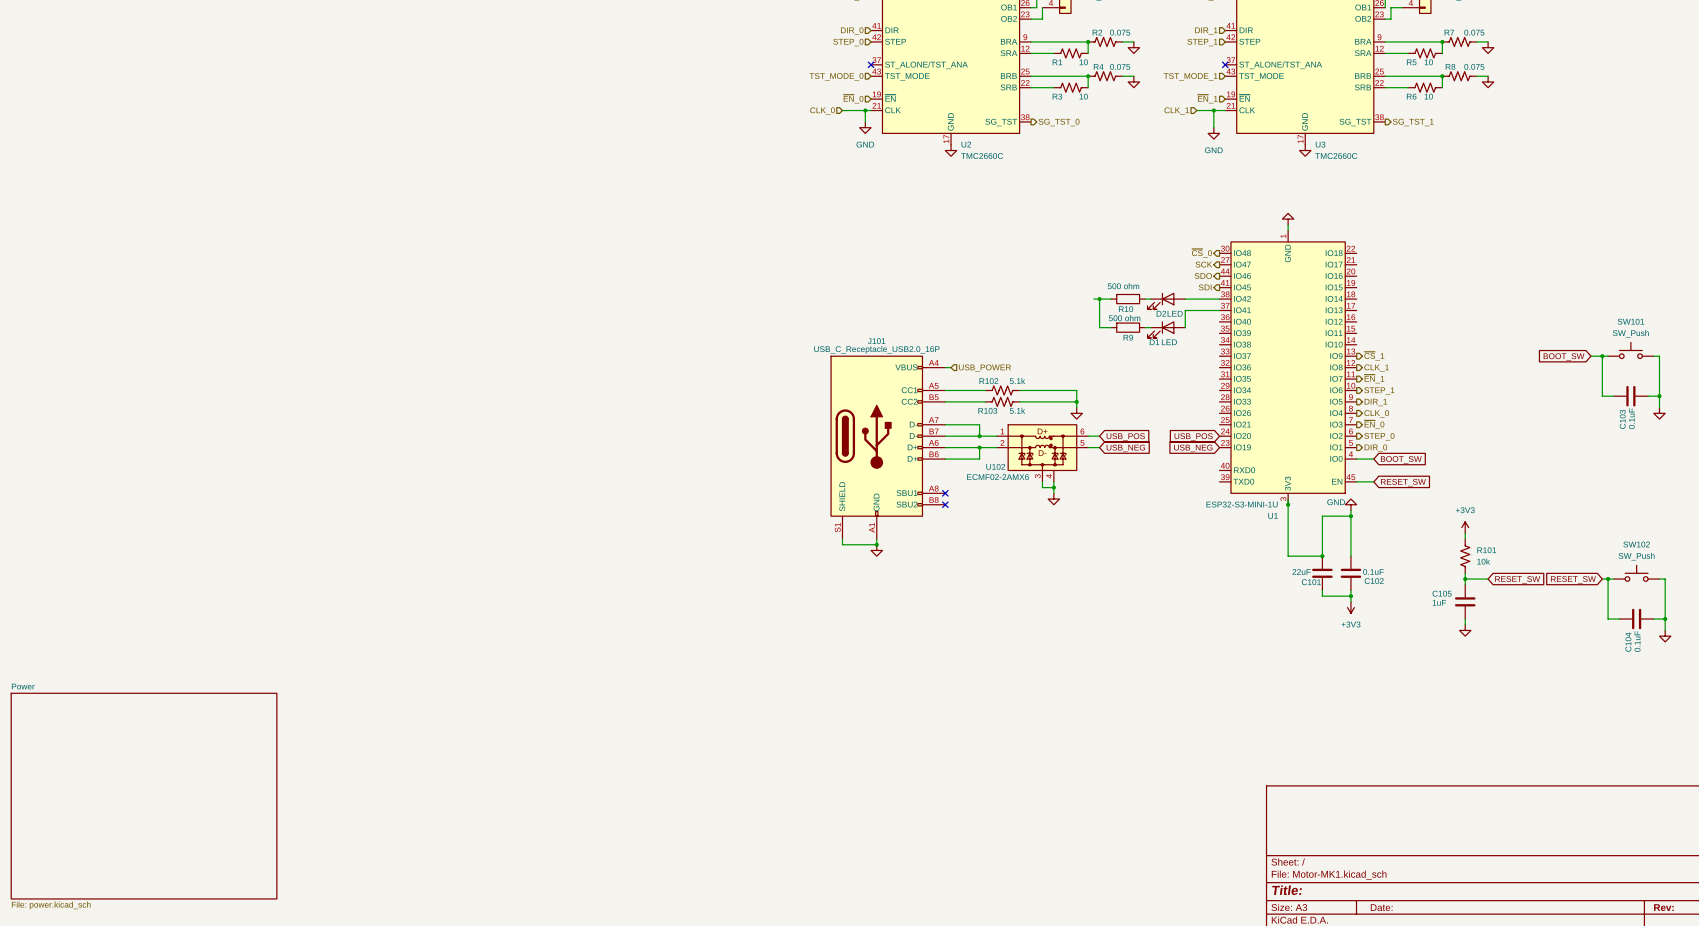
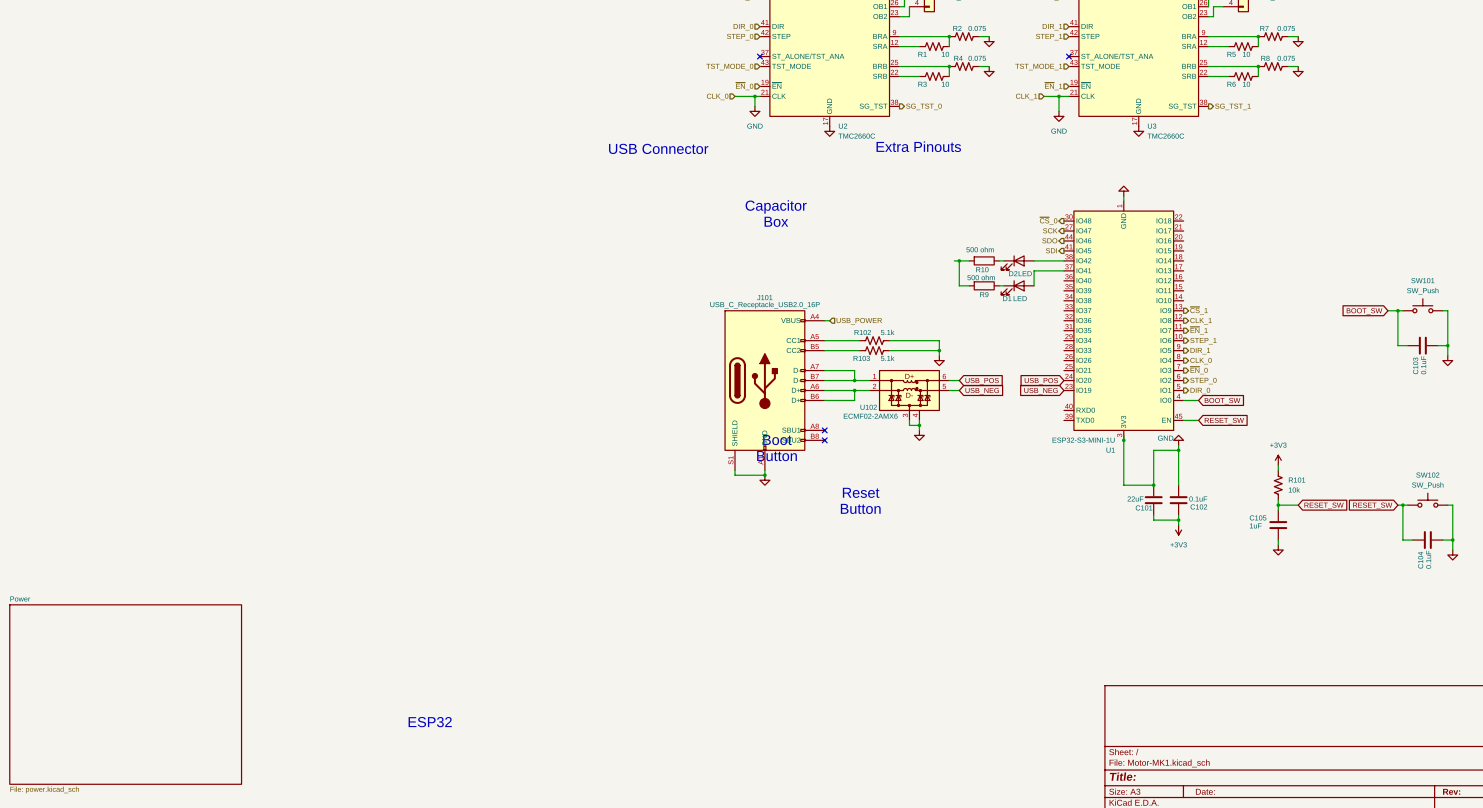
text: none -> Extra Pinouts (918, 146)
text: none -> USB Connector (658, 148)
text: none -> Capacitor (776, 206)
text: none -> Box (776, 221)
text: none -> Boot (777, 440)
text: none -> Button (776, 456)
text: none -> Reset (861, 492)
text: none -> Button (860, 508)
text: none -> ESP32 (430, 722)

